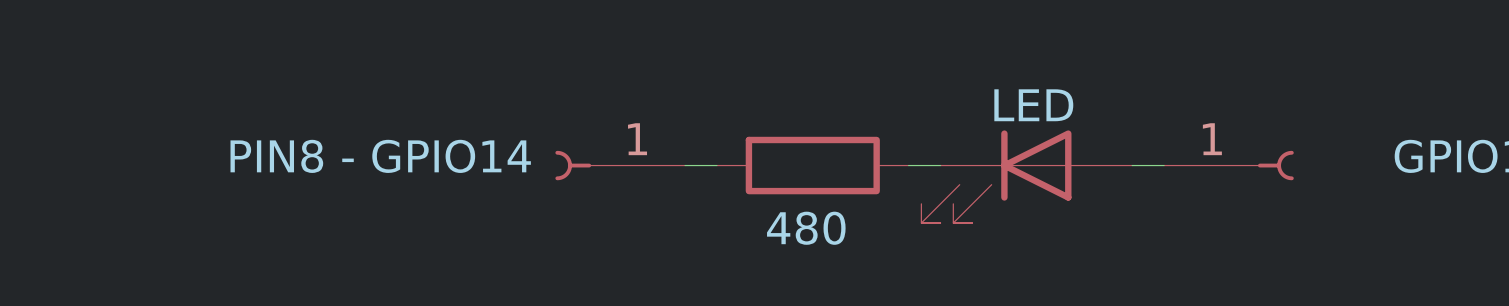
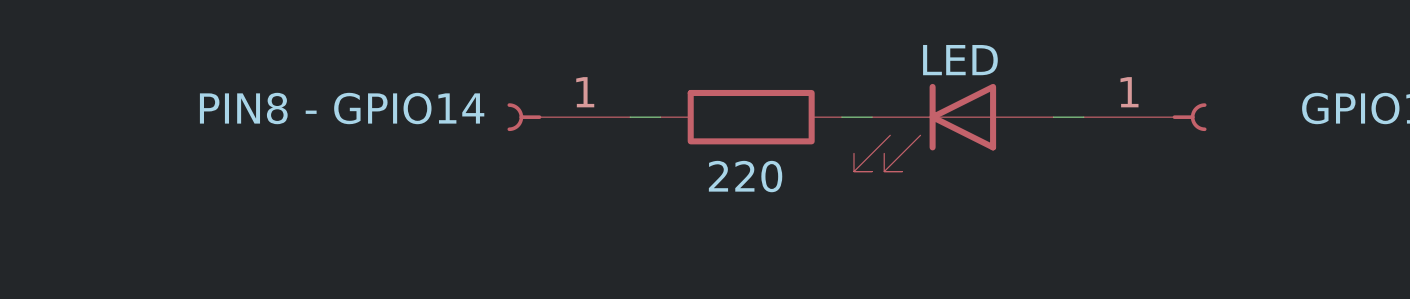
part value: 480 (806, 228) -> 220 (745, 176)

